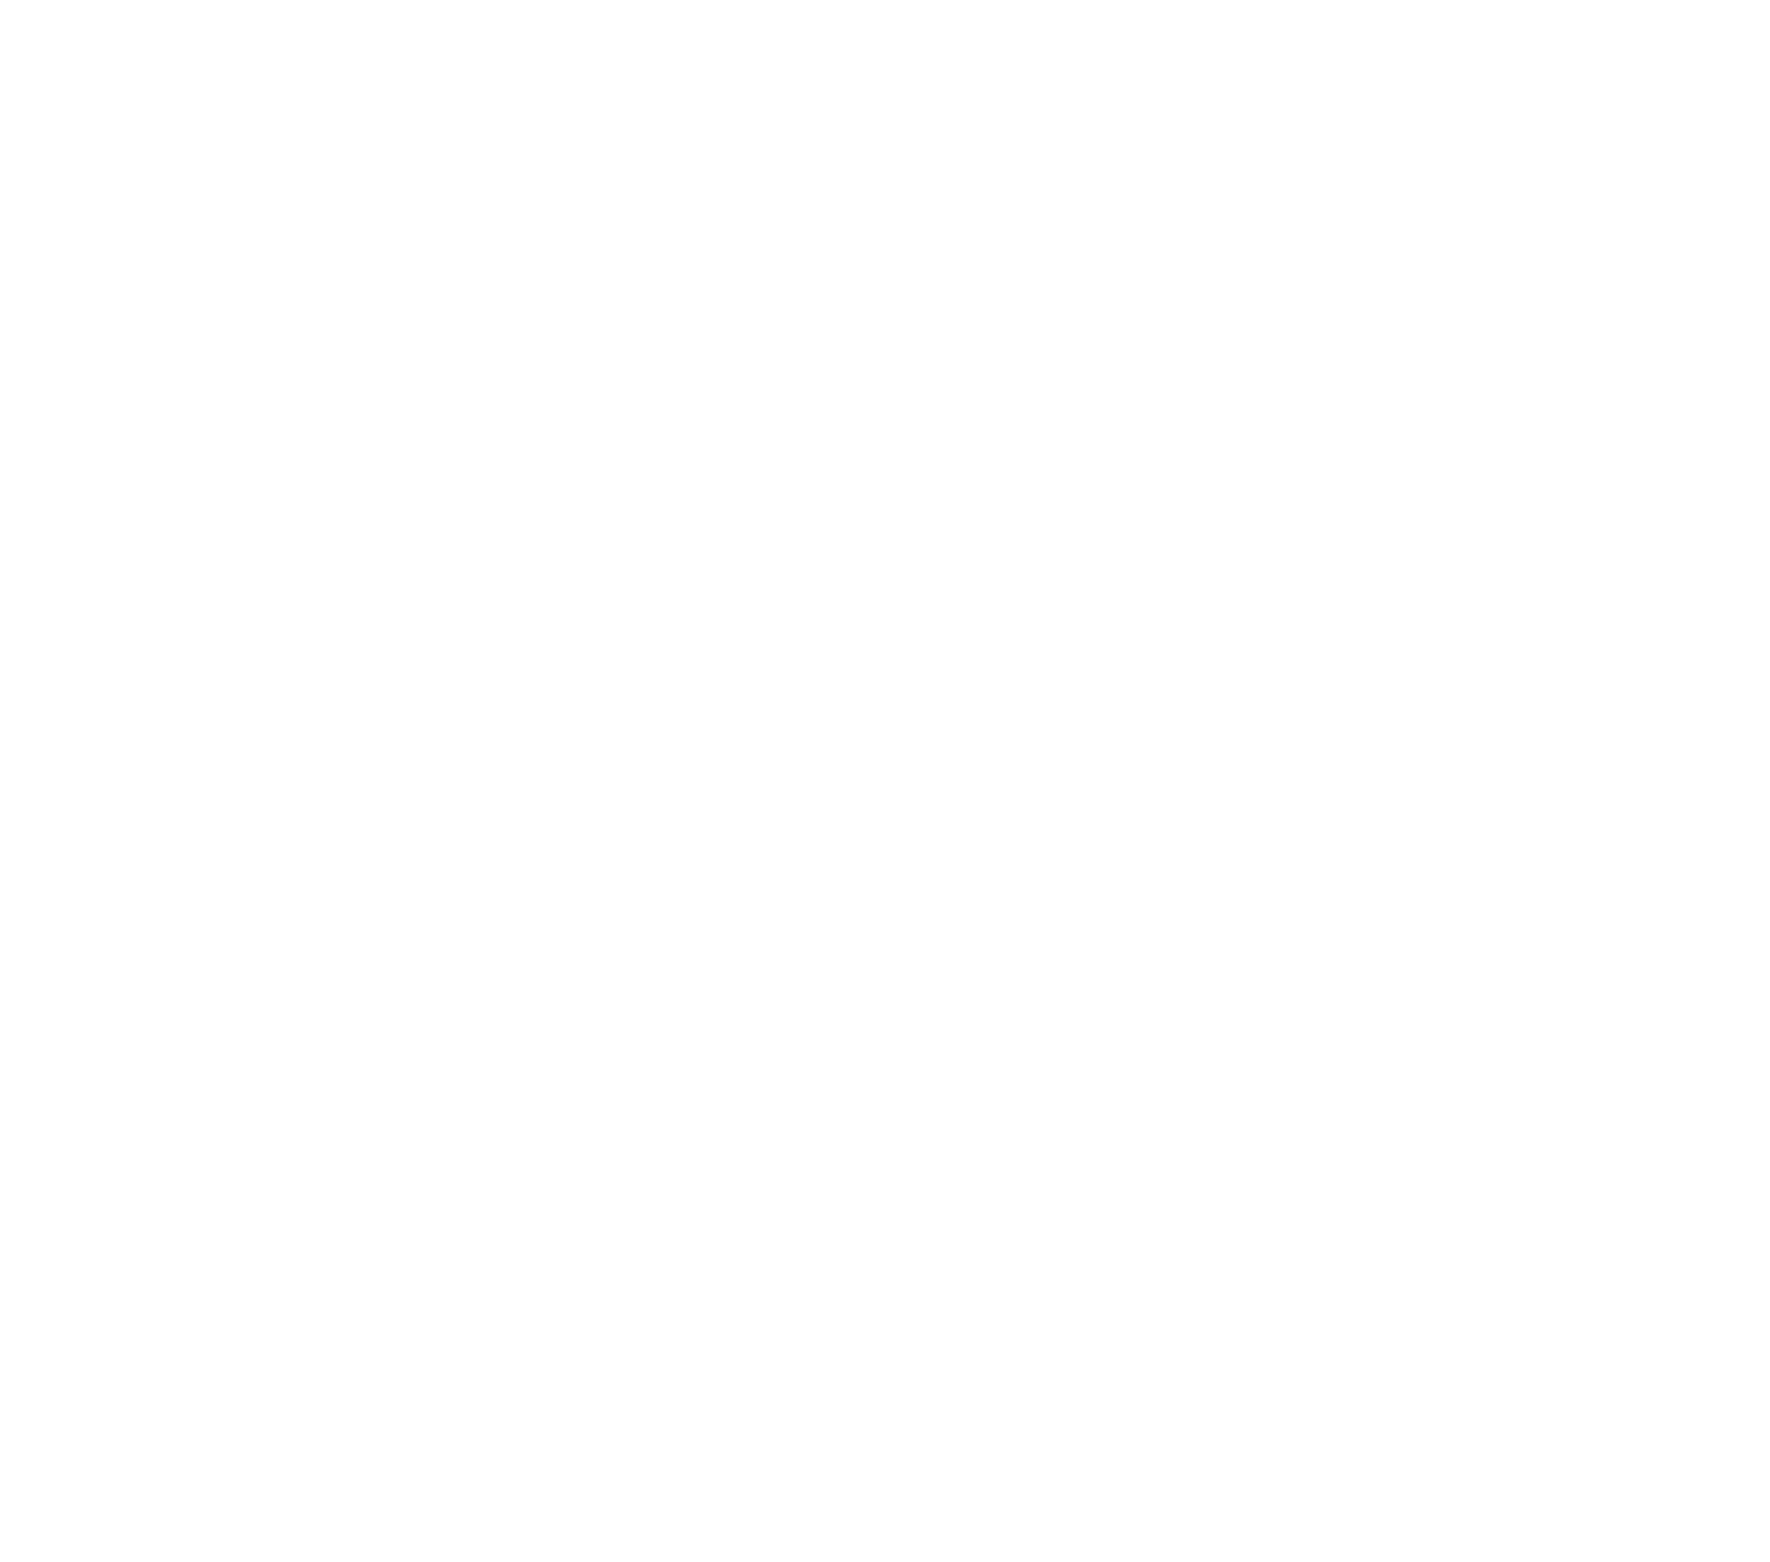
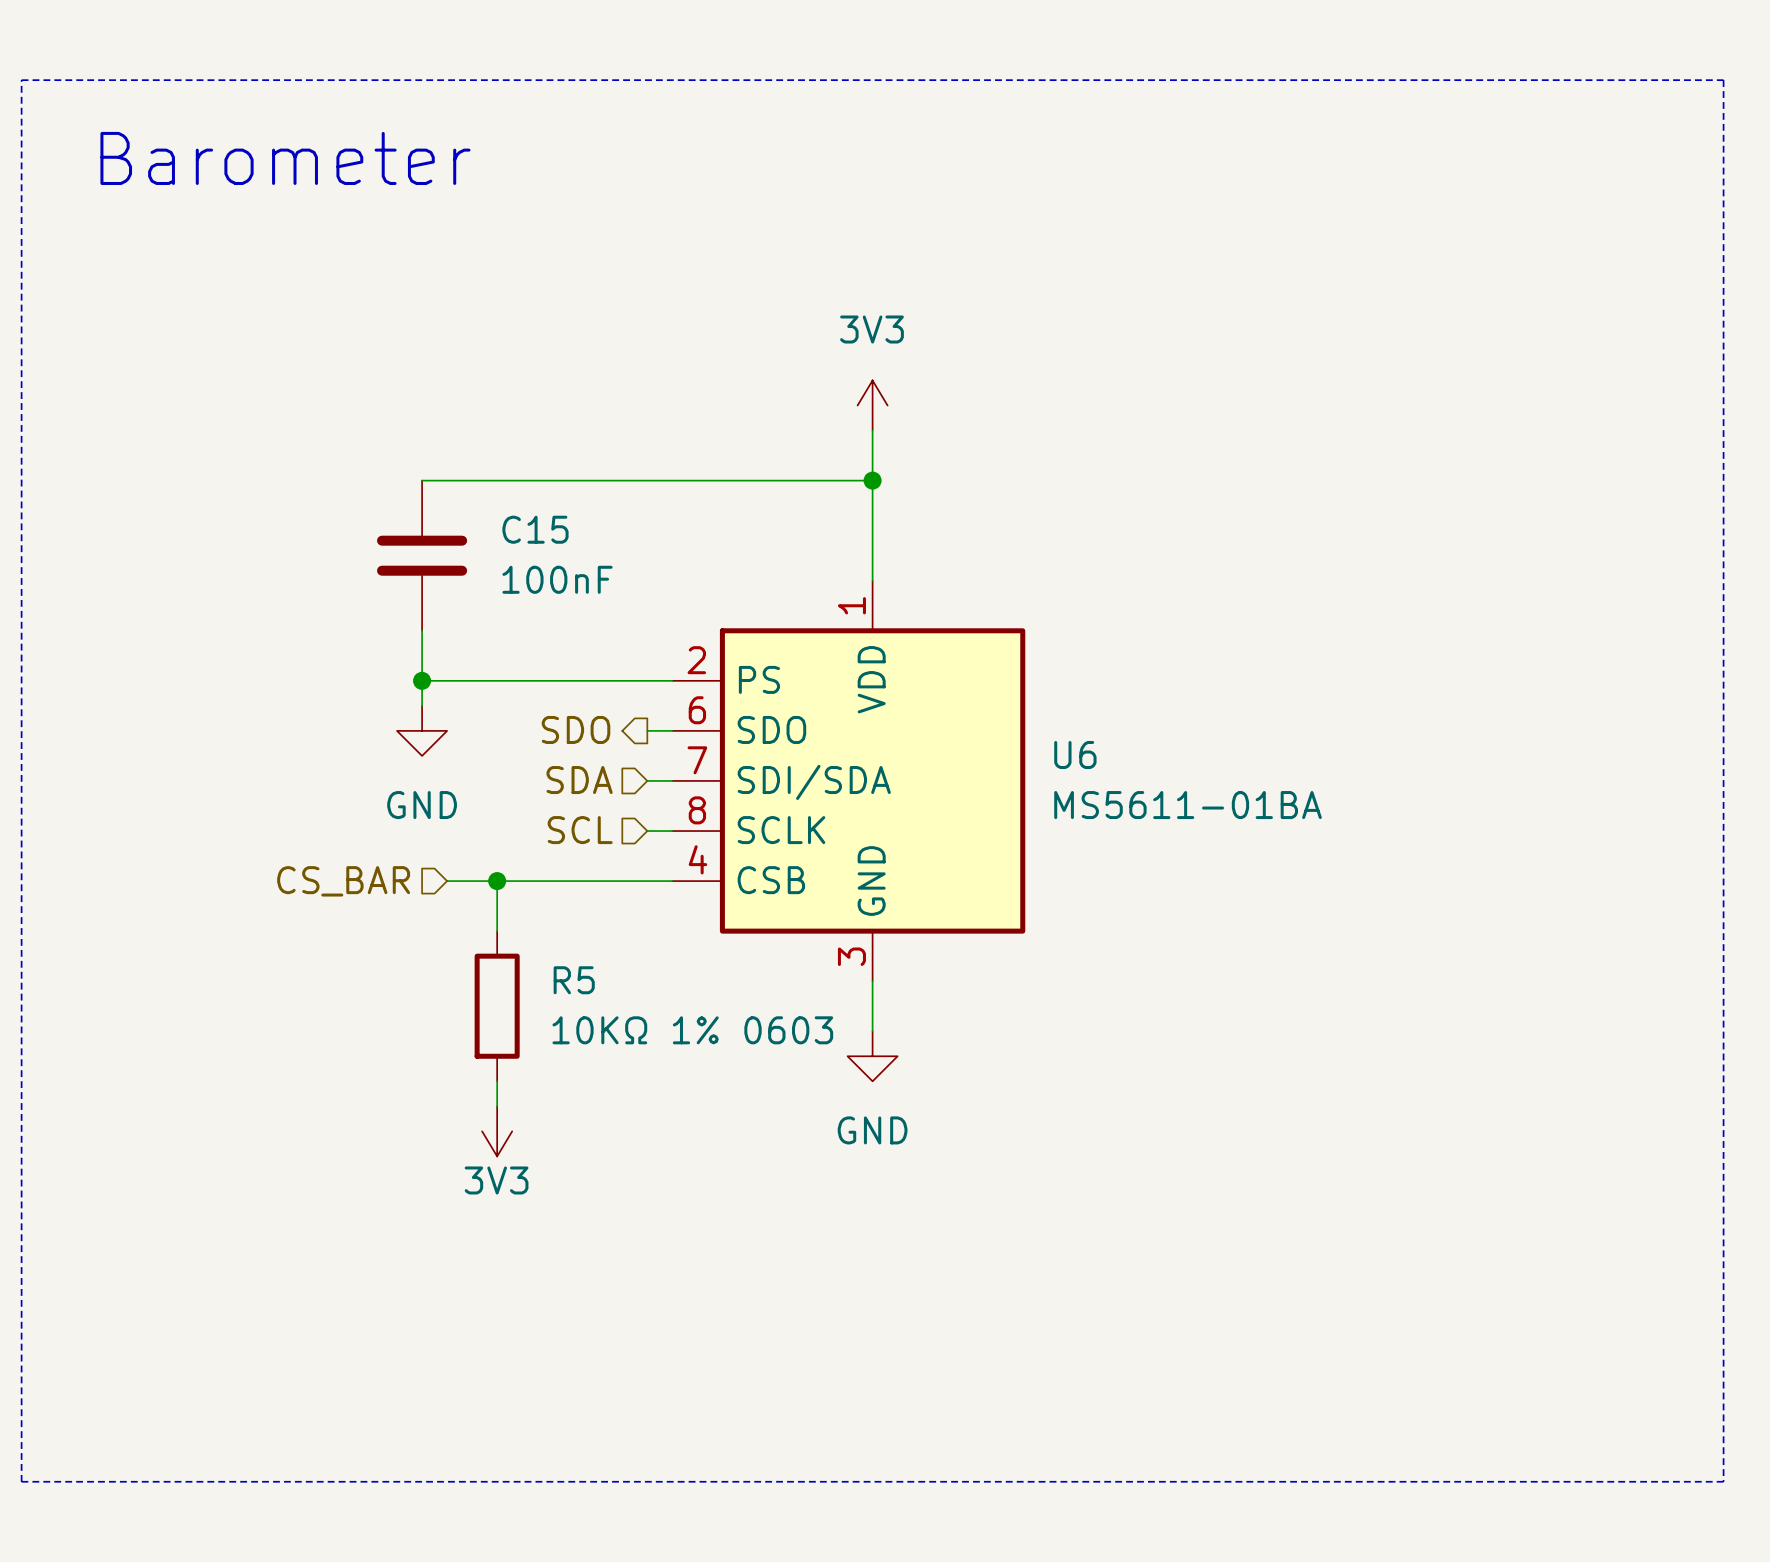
line: none -> (21, 80) (1723, 80) (1723, 1481) (21, 1481) (21, 80)
text: none -> Barometer (285, 158)
power symbol: none -> 3V3 (872, 405)
wire: none -> (872, 430) (872, 580)
wire: none -> (422, 480) (872, 480)
junction: none -> (872, 480)
C15: none -> 100nF (422, 555)
wire: none -> (422, 630) (422, 705)
wire: none -> (422, 680) (672, 680)
junction: none -> (422, 680)
hierarchical label: none -> SDO (576, 729)
power symbol: none -> GND (422, 730)
wire: none -> (647, 730) (672, 730)
hierarchical label: none -> SDA (579, 780)
wire: none -> (647, 780) (672, 780)
U6: none -> MS5611-01BA (848, 780)
hierarchical label: none -> SCL (580, 830)
wire: none -> (647, 831) (672, 831)
hierarchical label: none -> CS_BAR (343, 881)
wire: none -> (447, 881) (672, 881)
wire: none -> (497, 881) (497, 931)
junction: none -> (497, 881)
wire: none -> (872, 981) (872, 1031)
R5: none -> 10KΩ 1% 0603 (497, 1006)
power symbol: none -> GND (872, 1056)
wire: none -> (497, 1081) (497, 1106)
power symbol: none -> 3V3 (497, 1131)

